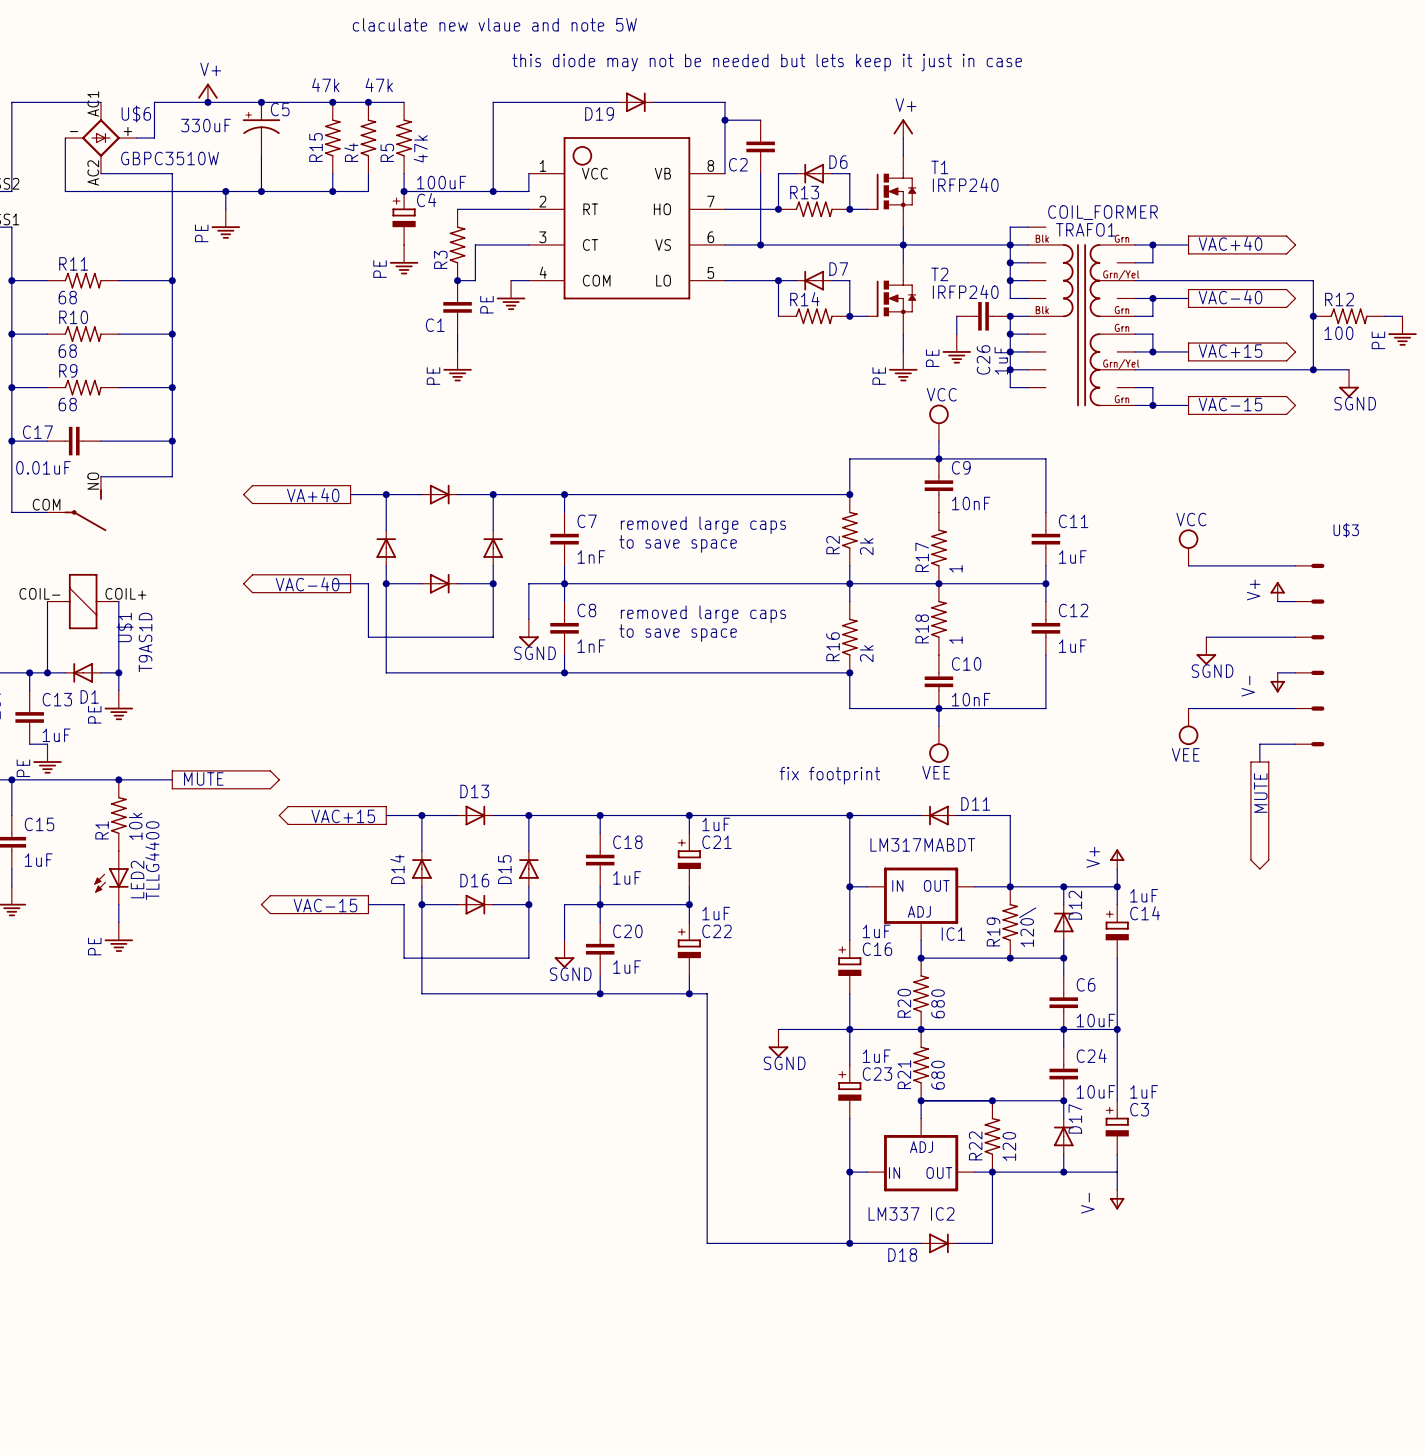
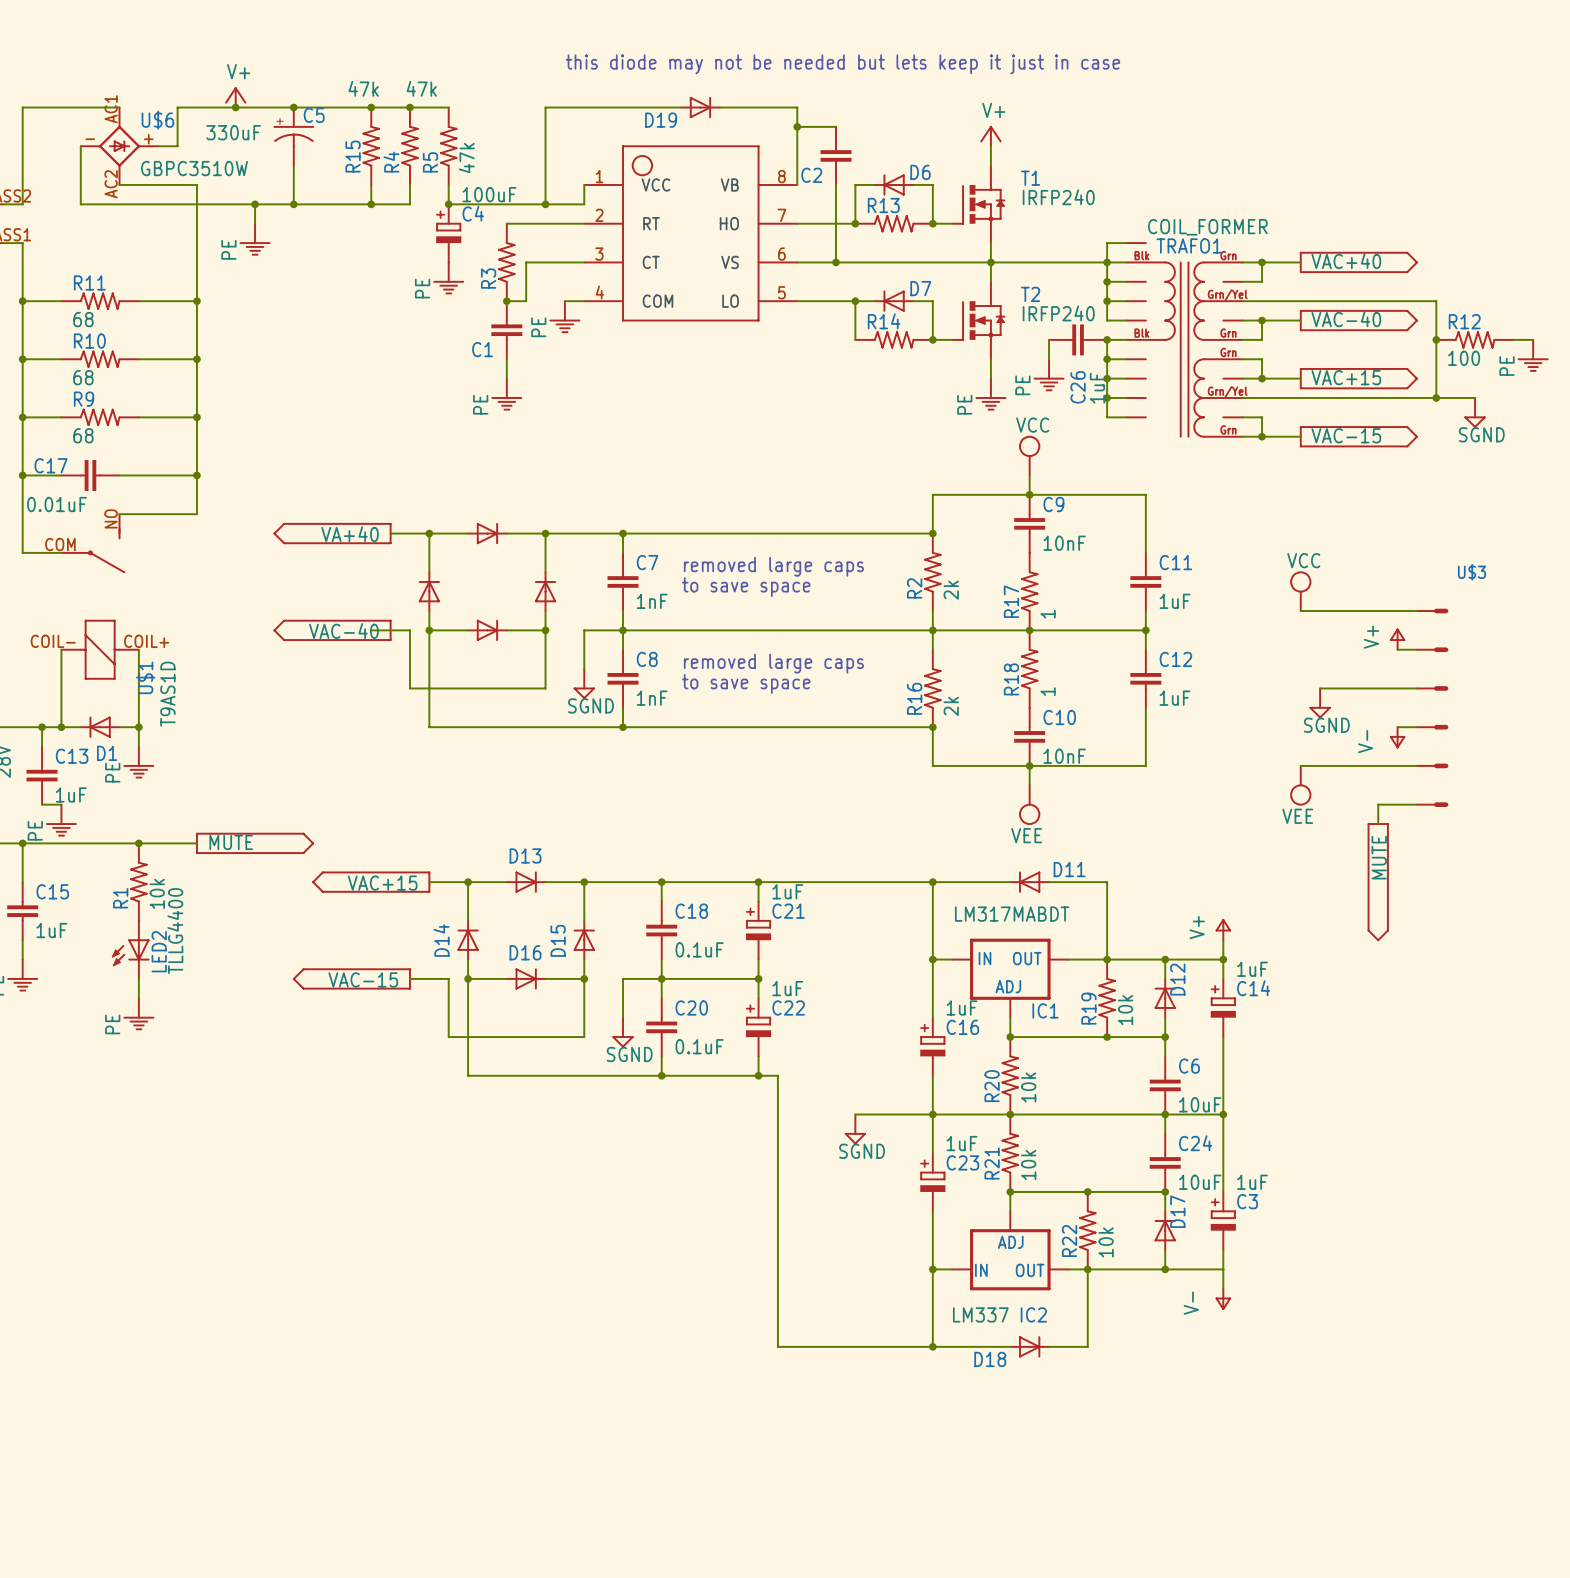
text: claculate new vlaue and note 5W (494, 24) -> none
text: fix footprint (829, 775) -> none
C18 value: 1uF (627, 877) -> 0.1uF (699, 949)
R19 value: 120\ (1027, 927) -> 10k (1125, 1010)
C20 value: 1uF (627, 967) -> 0.1uF (699, 1046)
R20 value: 680 (938, 1003) -> 10k (1028, 1087)
R21 value: 680 (938, 1075) -> 10k (1028, 1165)
R22 value: 120 (1009, 1146) -> 10k (1106, 1242)

